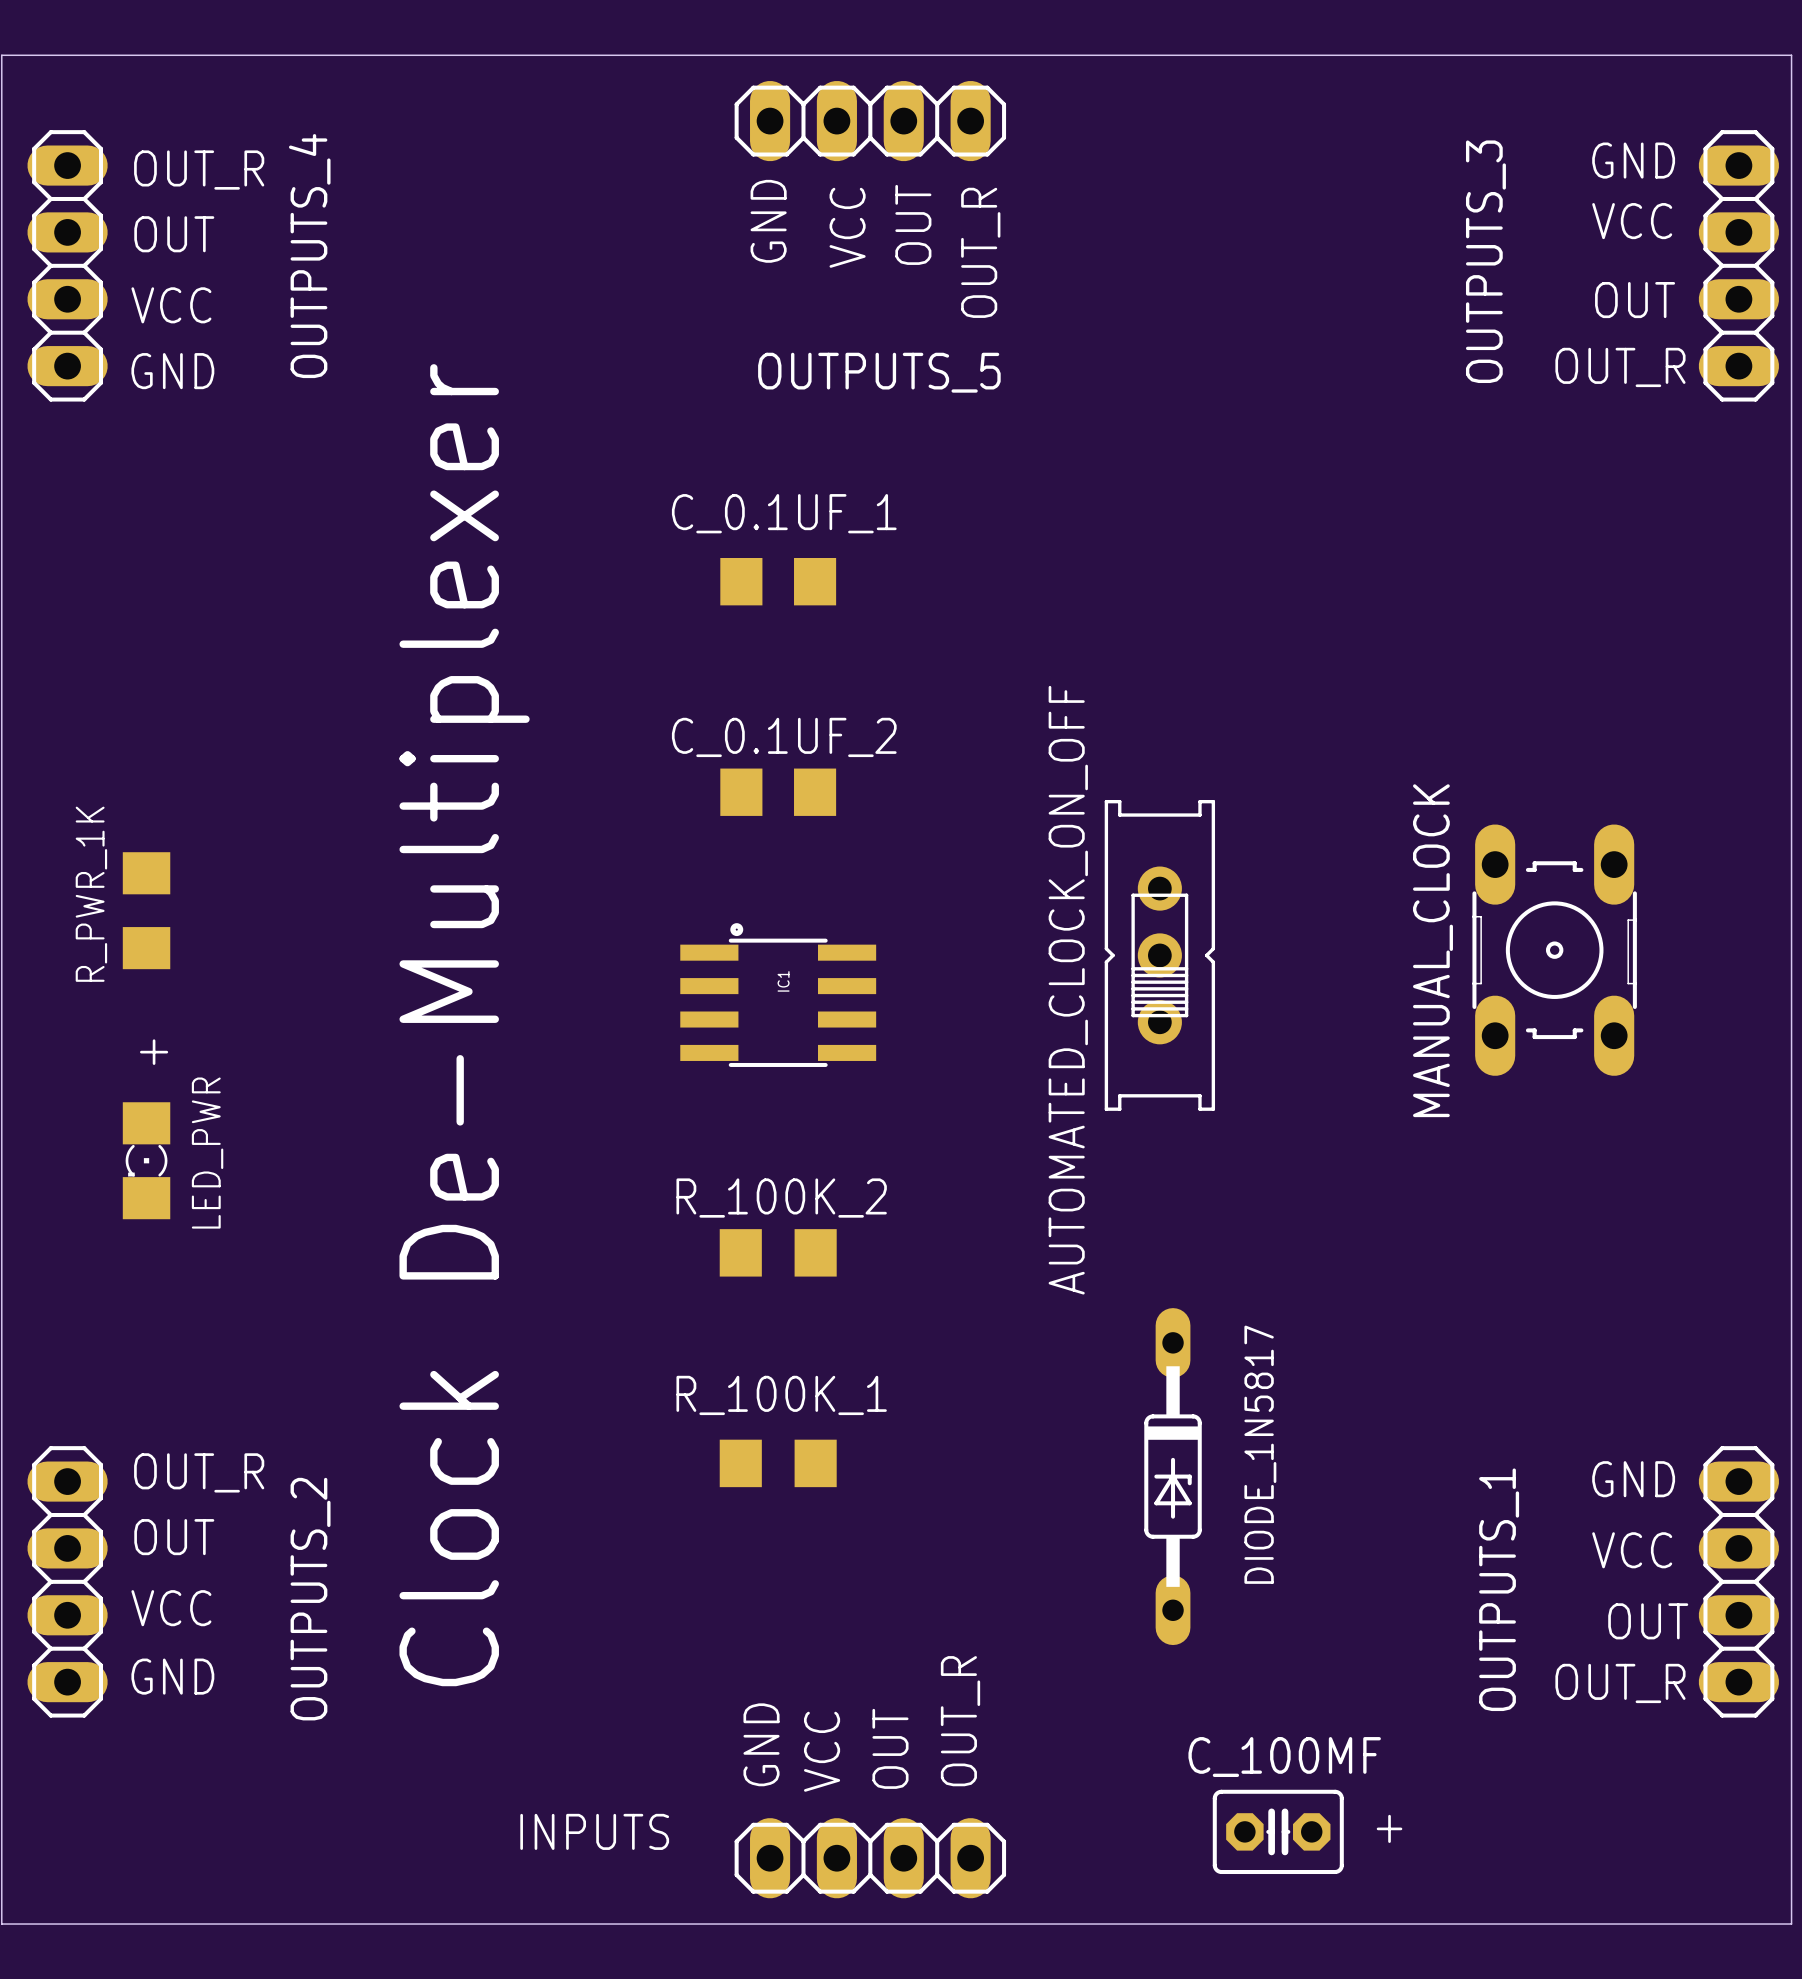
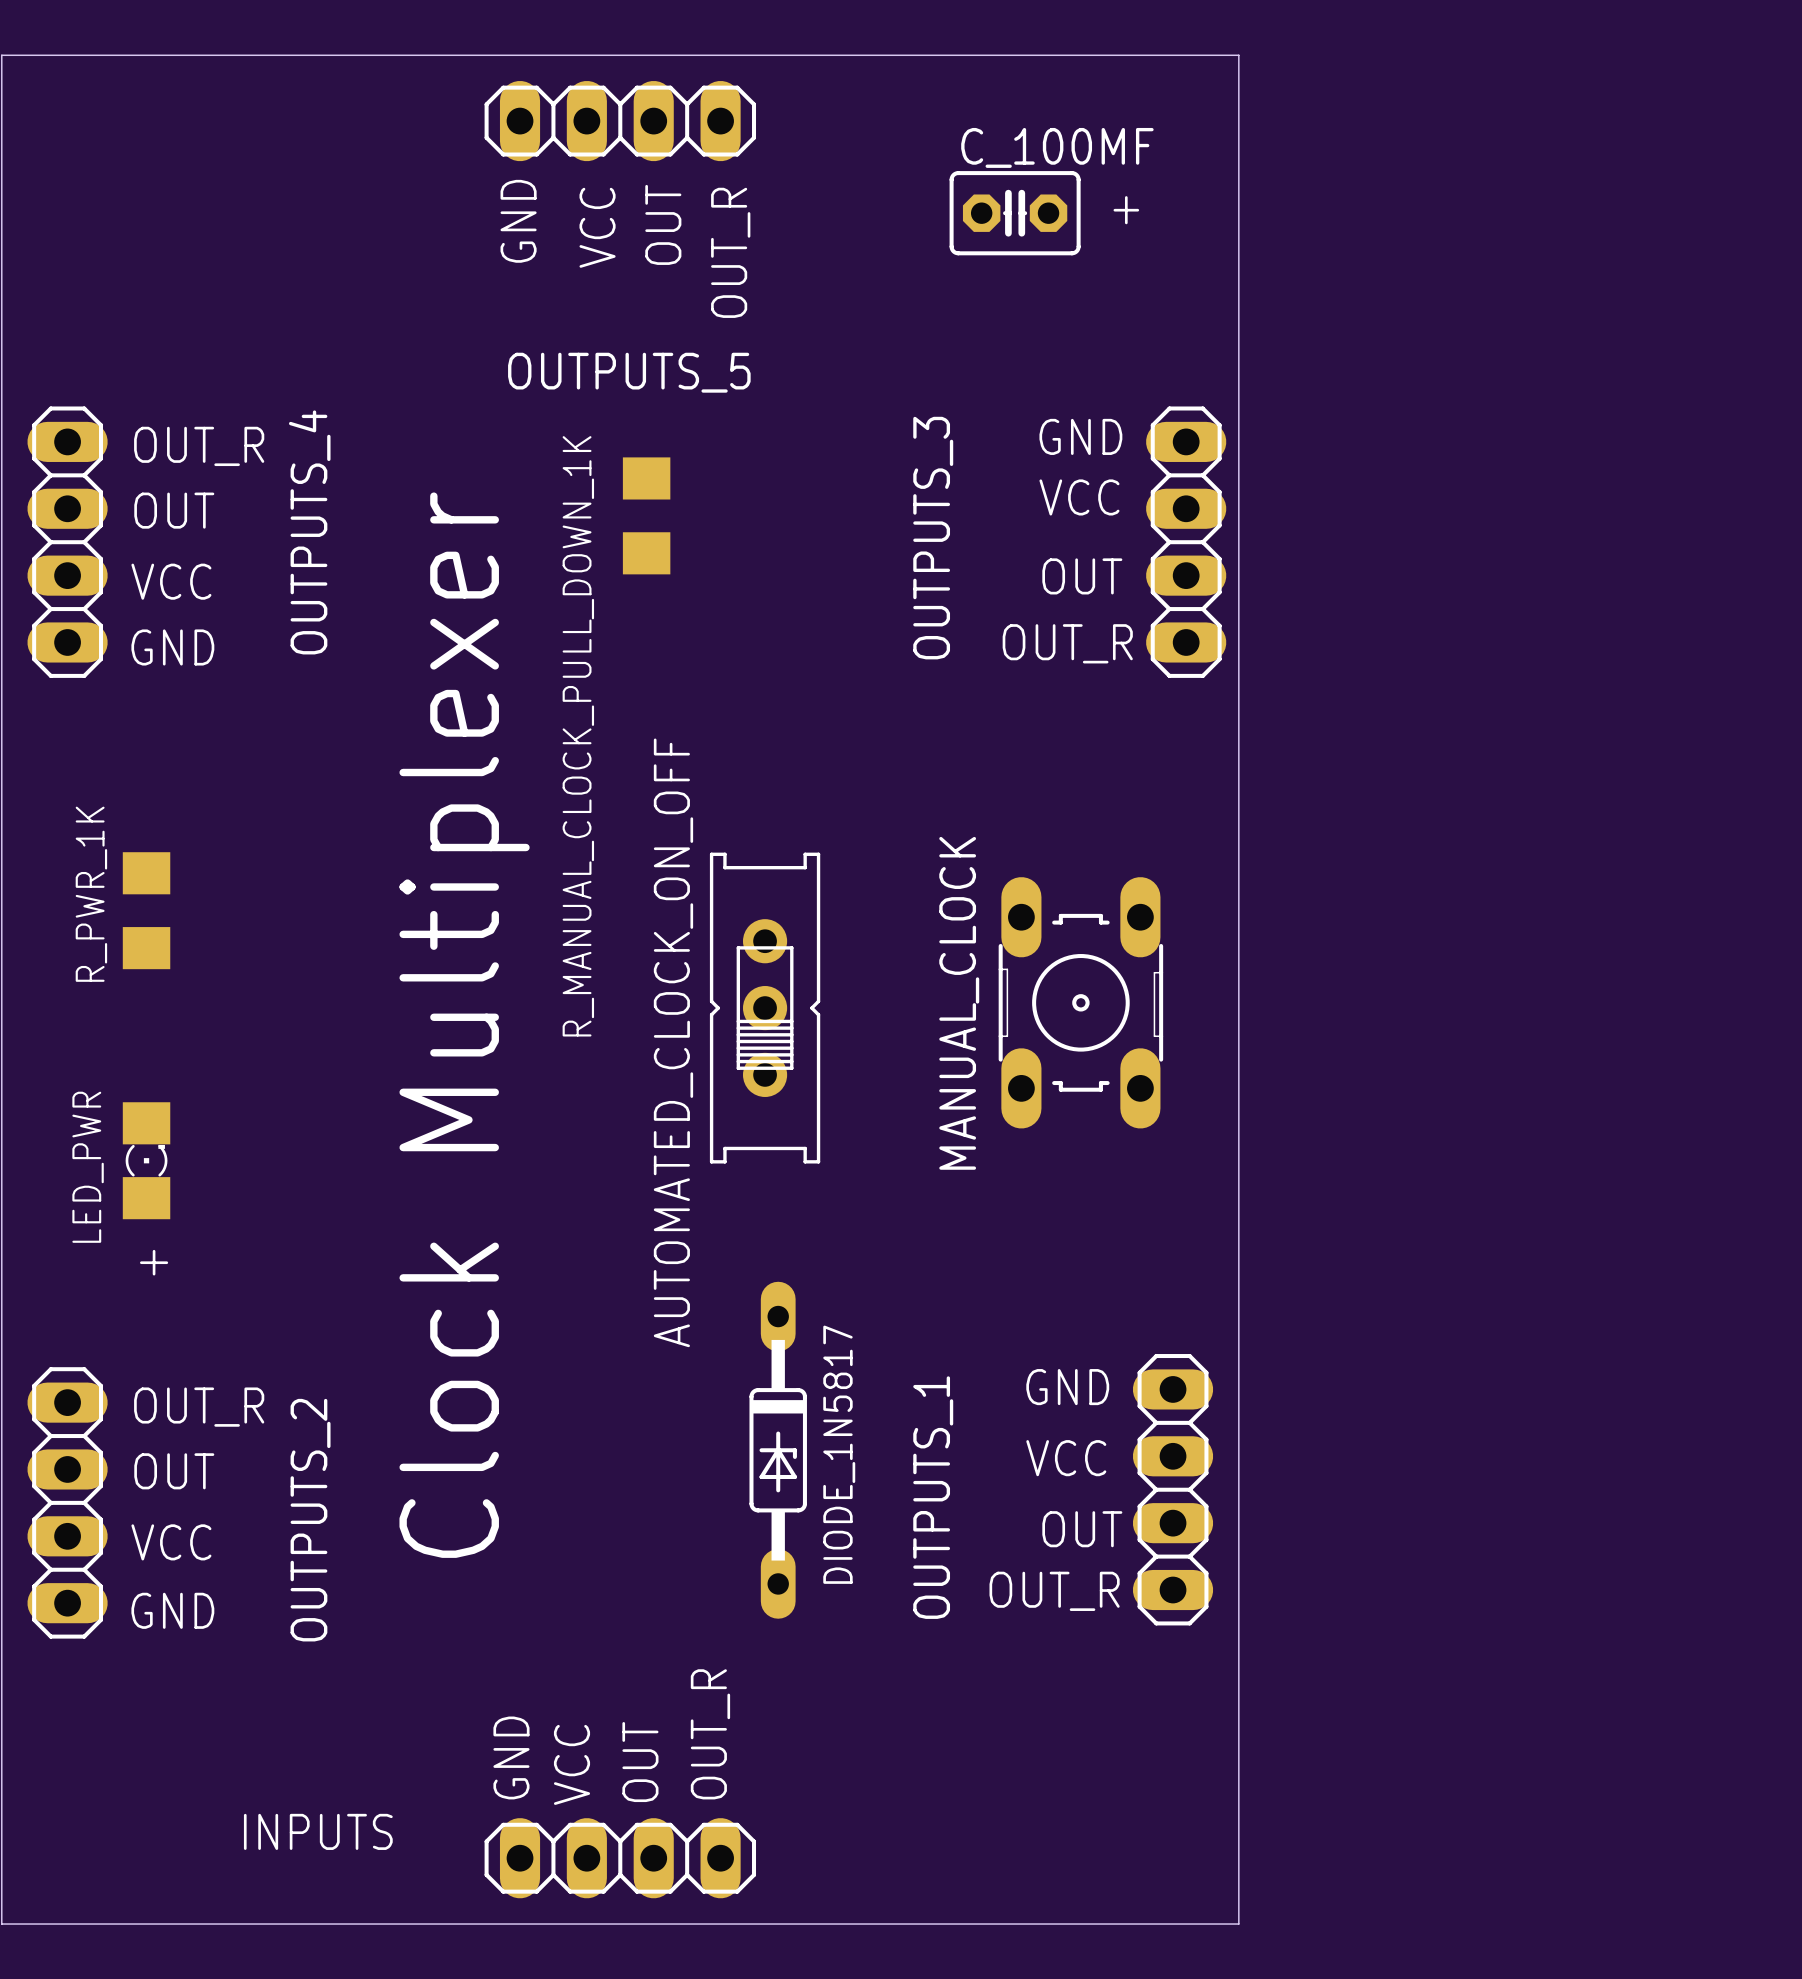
board edge: (1238, 55) (1791, 55) (1791, 1924) (1238, 1924) -> (1238, 55) (1238, 1924)
OUTPUTS_5 position: (870, 121) -> (620, 121)
text: GND (1633, 160) -> none
text: OUT_R (199, 170) -> none
text: none -> + (1126, 210)
text: none -> GND (518, 221)
text: GND (768, 221) -> none
text: VCC (1632, 221) -> none
text: none -> OUT (663, 224)
text: OUT (913, 224) -> none
text: none -> VCC (597, 227)
text: VCC (847, 227) -> none
text: OUT (174, 234) -> none
text: none -> OUT_R (730, 252)
text: OUT_R (980, 252) -> none
OUTPUTS_4 position: (67, 265) -> (67, 542)
OUTPUTS_3 position: (1738, 265) -> (1186, 542)
text: OUT (1635, 300) -> none
text: VCC (171, 305) -> none
text: OUT_R (1620, 367) -> none
text: GND (172, 371) -> none
text: none -> GND (1080, 436)
text: none -> OUT_R (199, 446)
text: none -> VCC (1079, 497)
text: none -> OUT (174, 510)
R_MANUAL_CLOCK_PULL_DOWN_1K: none -> (646, 515)
text: none -> OUT (1082, 576)
text: none -> VCC (171, 581)
C_0.1UF_1: (778, 581) -> none
text: none -> OUT_R (1067, 643)
text: none -> GND (172, 647)
C_0.1UF_2: (778, 792) -> none
MANUAL_CLOCK position: (1554, 950) -> (1080, 1002)
AUTOMATED_CLOCK_ON_OFF position: (1159, 955) -> (765, 1008)
IC1: (778, 995) -> none
text: Clock De-Multiplexer (464, 1025) -> Clock Multiplexer (464, 1025)
text position: + (154, 1052) -> + (154, 1262)
LED_PWR rotation: 0° (146, 1160) -> 180° (146, 1160)
R_100K_2: (778, 1252) -> none
text: none -> GND (1067, 1387)
DIODE_1N5817 name position: DIODE_1N5817 (1260, 1454) -> DIODE_1N5817 (839, 1454)
text: none -> VCC (1066, 1458)
R_100K_1: (778, 1463) -> none
text position: OUT_R (199, 1472) -> OUT_R (199, 1407)
DIODE_1N5817 position: (1173, 1476) -> (778, 1450)
text: GND (1633, 1479) -> none
text: none -> OUT (1082, 1529)
text position: OUT (174, 1537) -> OUT (174, 1471)
text: VCC (1632, 1550) -> none
OUTPUTS_2 position: (67, 1581) -> (67, 1502)
OUTPUTS_1 position: (1738, 1581) -> (1173, 1489)
text position: VCC (171, 1608) -> VCC (171, 1542)
text: OUT (1648, 1621) -> none
text position: GND (172, 1676) -> GND (172, 1610)
text: OUT_R (1620, 1683) -> none
text rotation: 0° (960, 1721) -> 90° clockwise (1054, 1591)
text: none -> OUT_R (710, 1734)
text: GND (761, 1744) -> none
text: OUT (890, 1748) -> none
text: VCC (822, 1751) -> none
text: none -> GND (511, 1757)
C_100MF name position: C_100MF (1284, 1757) -> C_100MF (1057, 147)
text: none -> OUT (640, 1762)
text: none -> VCC (572, 1764)
text: + (1389, 1828) -> none
text position: INPUTS (594, 1831) -> INPUTS (318, 1831)
C_100MF position: (1278, 1831) -> (1015, 213)
part position: (870, 1858) -> (620, 1858)

